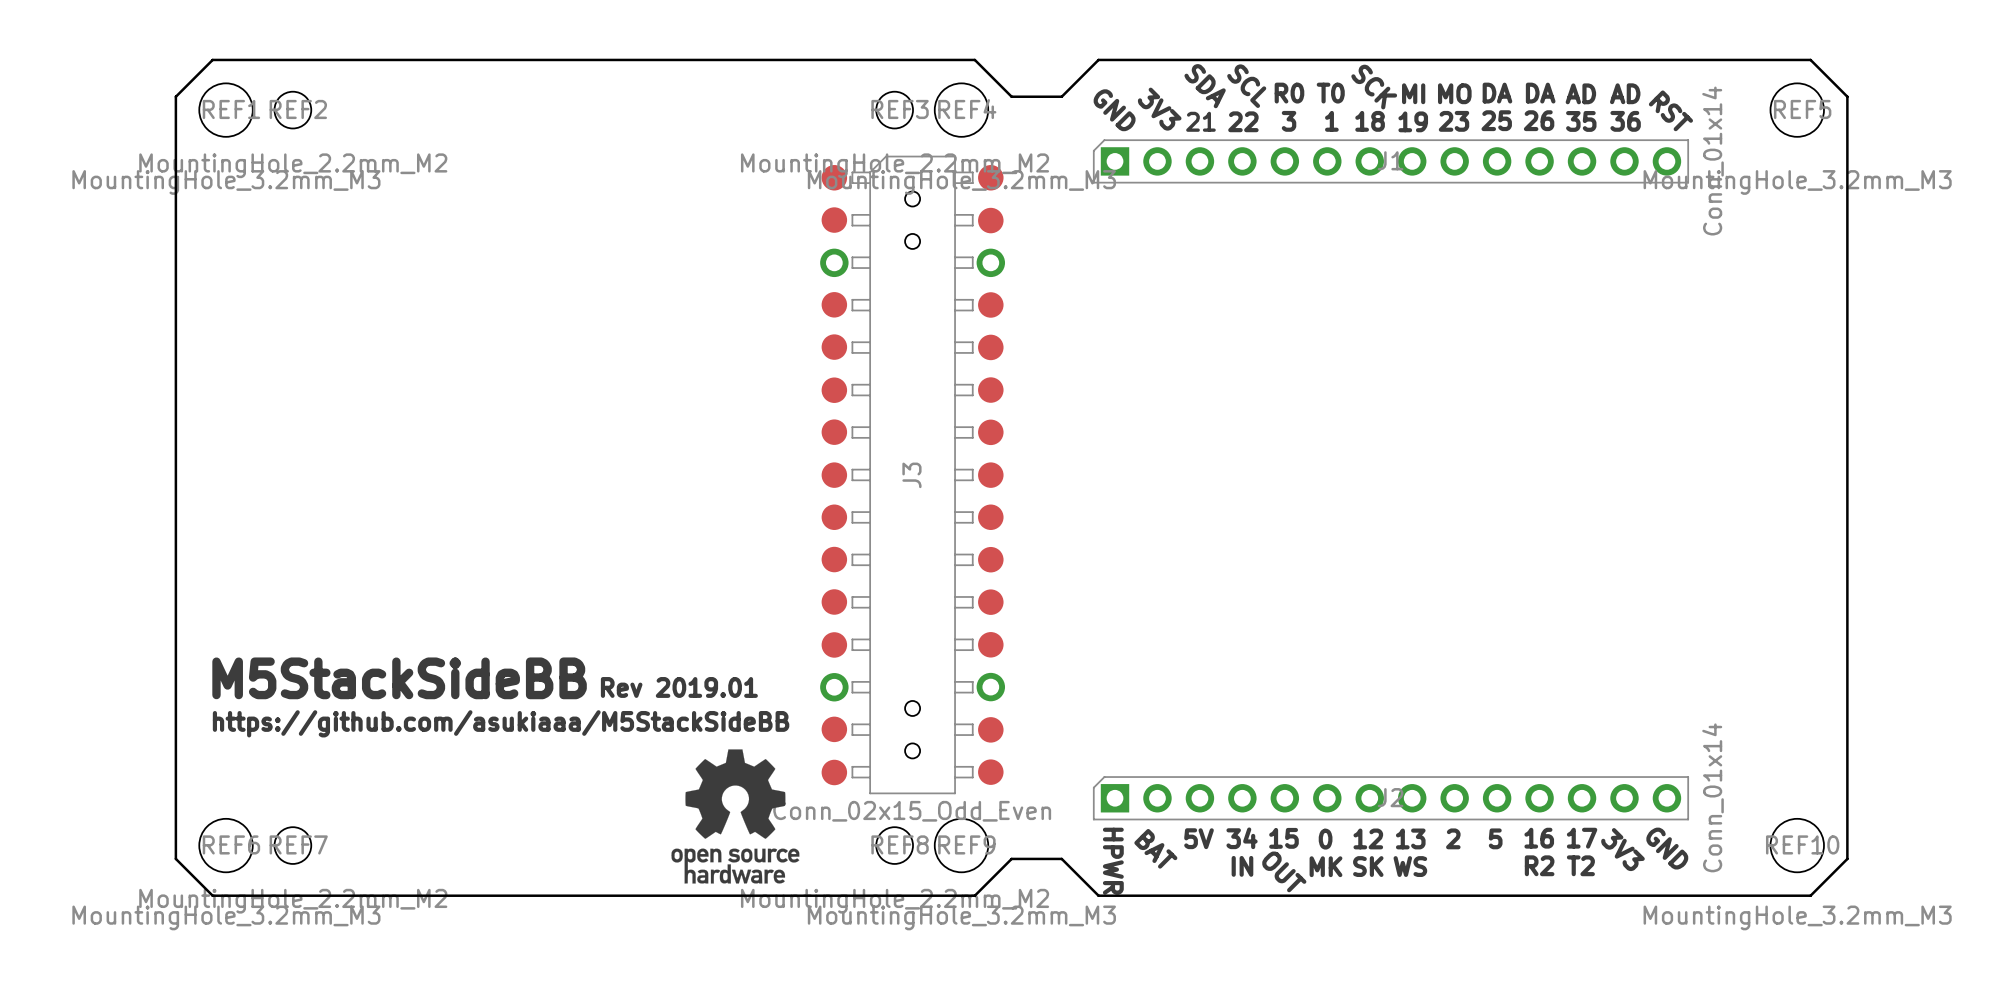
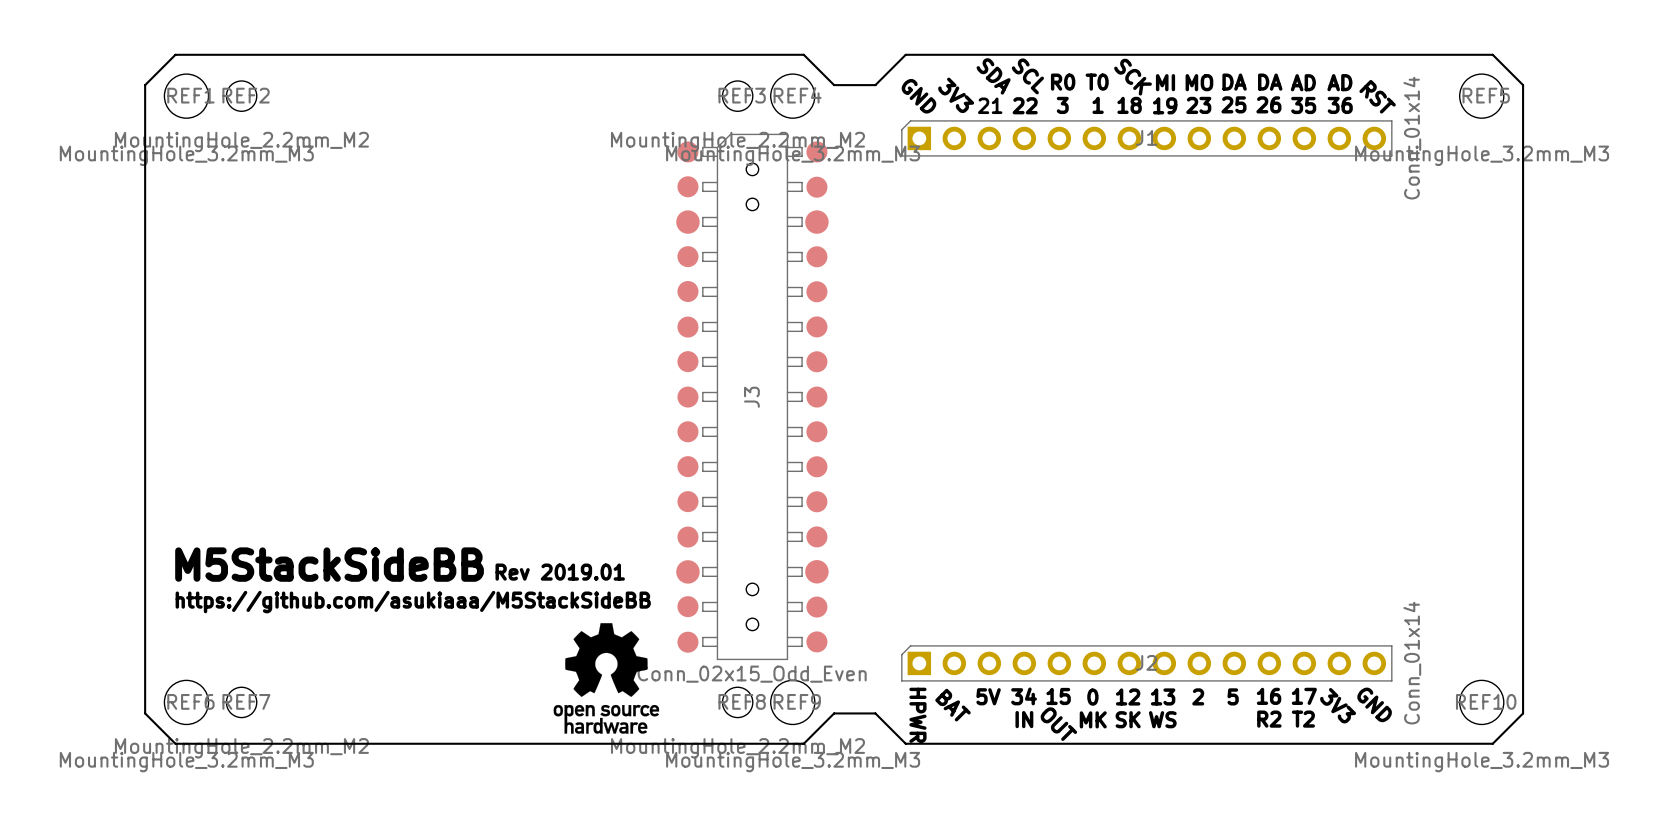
J3 footprint: [820, 155, 1006, 795] -> [676, 133, 829, 661]

